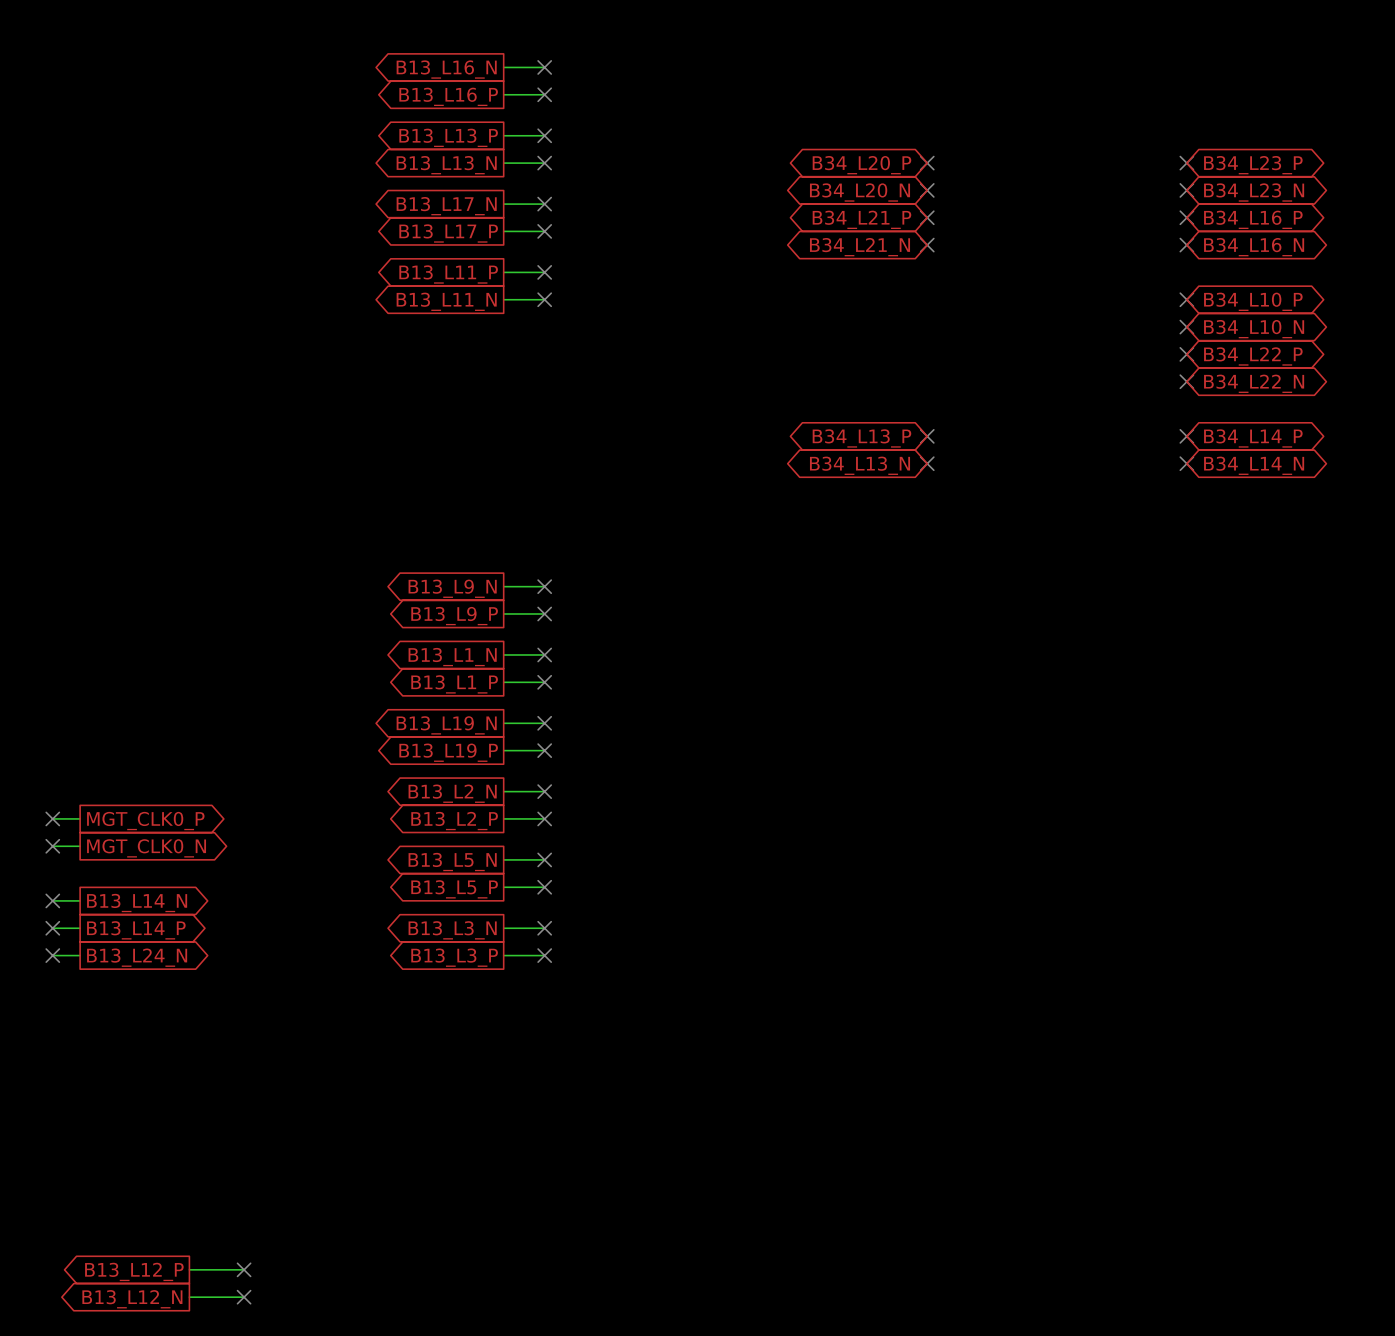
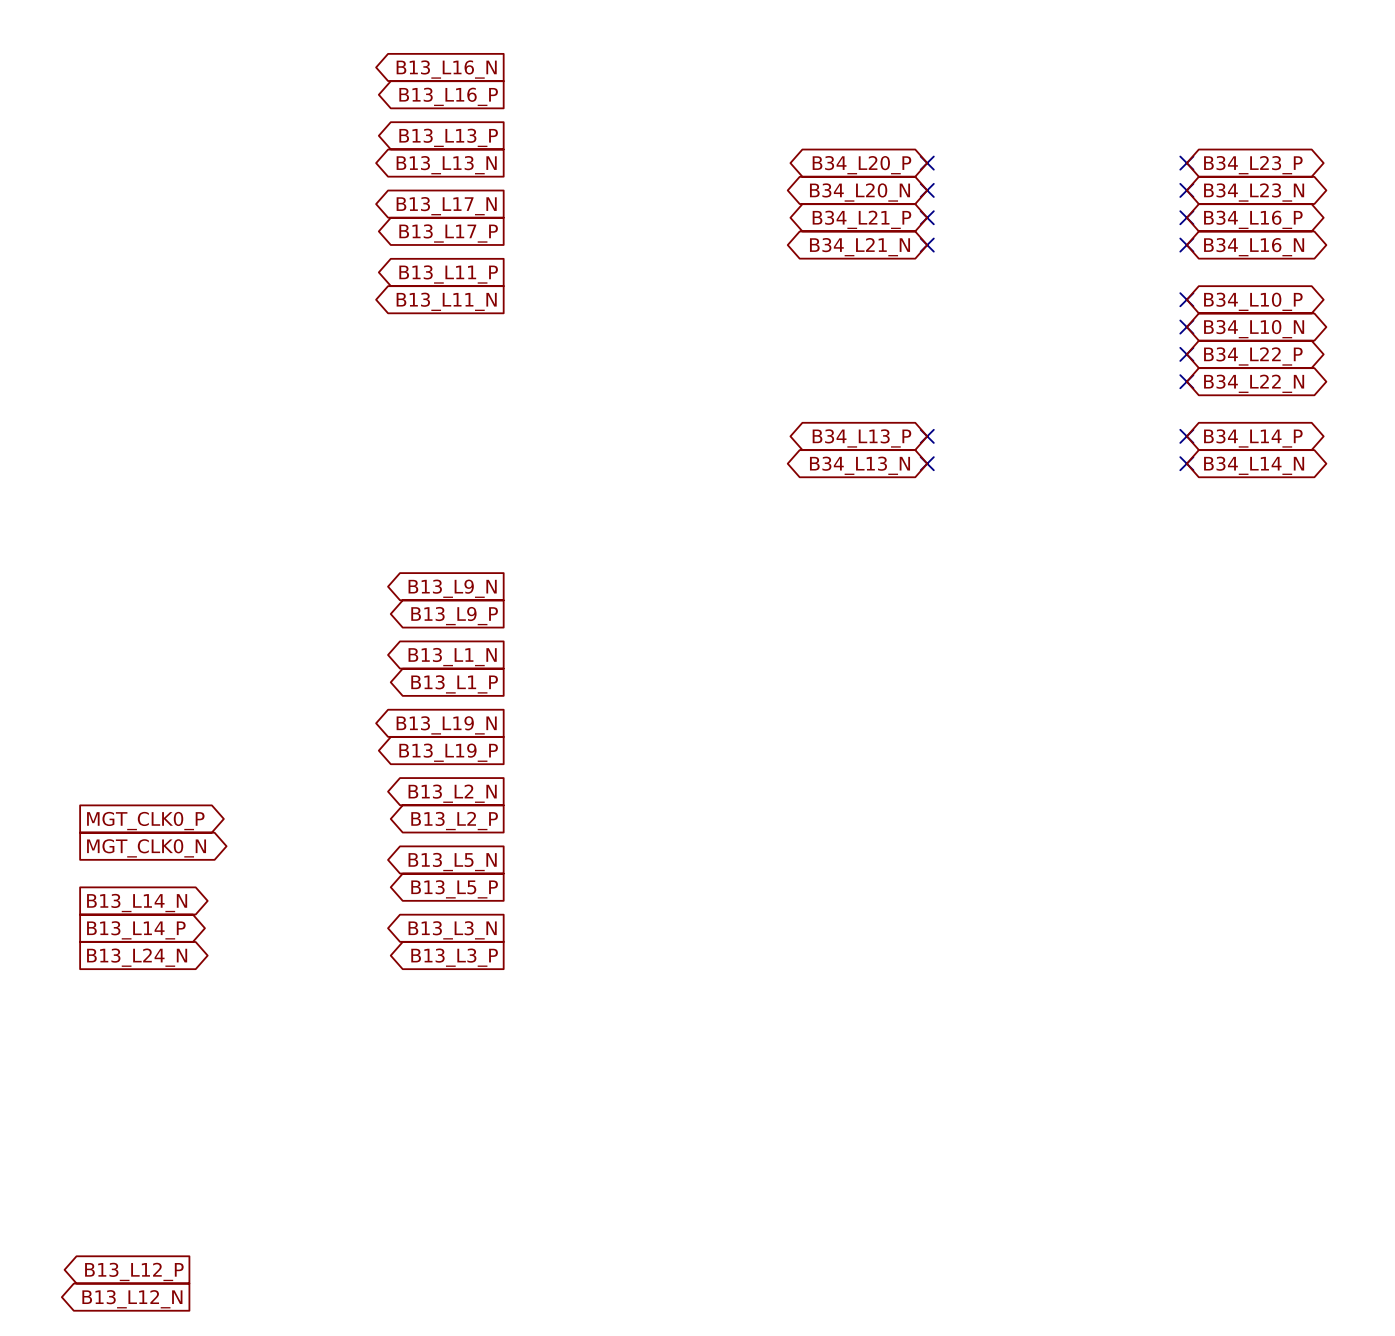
wire: (503, 67) (544, 67) -> none
no-connect mark: (544, 67) -> none
wire: (503, 94) (544, 94) -> none
no-connect mark: (544, 94) -> none
wire: (503, 135) (544, 135) -> none
no-connect mark: (544, 135) -> none
wire: (503, 163) (544, 163) -> none
no-connect mark: (544, 163) -> none
wire: (503, 204) (544, 204) -> none
no-connect mark: (544, 204) -> none
wire: (503, 231) (544, 231) -> none
no-connect mark: (544, 231) -> none
wire: (503, 272) (544, 272) -> none
no-connect mark: (544, 272) -> none
wire: (503, 299) (544, 299) -> none
no-connect mark: (544, 299) -> none
wire: (503, 586) (544, 586) -> none
no-connect mark: (544, 586) -> none
wire: (503, 613) (544, 613) -> none
no-connect mark: (544, 613) -> none
wire: (503, 654) (544, 654) -> none
no-connect mark: (544, 654) -> none
wire: (503, 682) (544, 682) -> none
no-connect mark: (544, 682) -> none
wire: (503, 723) (544, 723) -> none
no-connect mark: (544, 723) -> none
wire: (503, 750) (544, 750) -> none
no-connect mark: (544, 750) -> none
wire: (503, 791) (544, 791) -> none
no-connect mark: (544, 791) -> none
wire: (52, 818) (80, 818) -> none
no-connect mark: (52, 818) -> none
wire: (503, 818) (544, 818) -> none
no-connect mark: (544, 818) -> none
wire: (52, 846) (80, 846) -> none
no-connect mark: (52, 846) -> none
wire: (503, 859) (544, 859) -> none
no-connect mark: (544, 859) -> none
wire: (503, 887) (544, 887) -> none
no-connect mark: (544, 887) -> none
wire: (52, 900) (80, 900) -> none
no-connect mark: (52, 900) -> none
wire: (52, 928) (80, 928) -> none
no-connect mark: (52, 928) -> none
wire: (503, 928) (544, 928) -> none
no-connect mark: (544, 928) -> none
wire: (52, 955) (80, 955) -> none
no-connect mark: (52, 955) -> none
wire: (503, 955) (544, 955) -> none
no-connect mark: (544, 955) -> none
wire: (189, 1269) (244, 1269) -> none
no-connect mark: (244, 1269) -> none
wire: (189, 1297) (244, 1297) -> none
no-connect mark: (244, 1297) -> none

